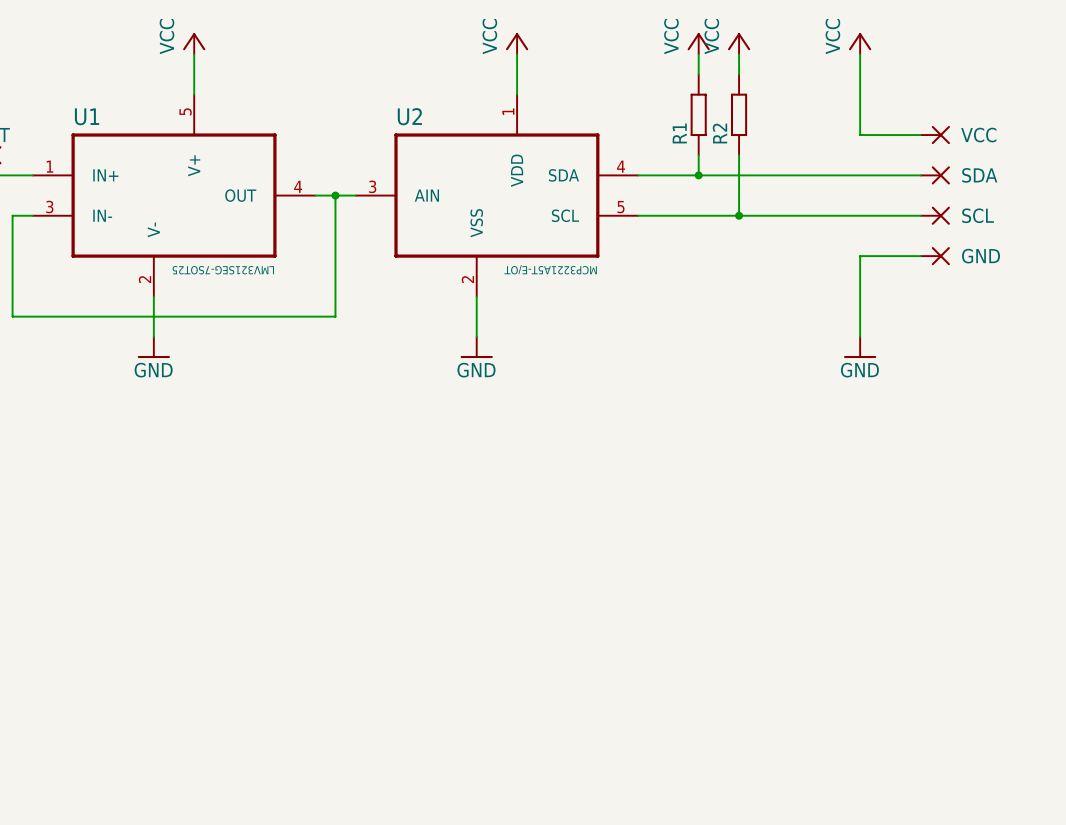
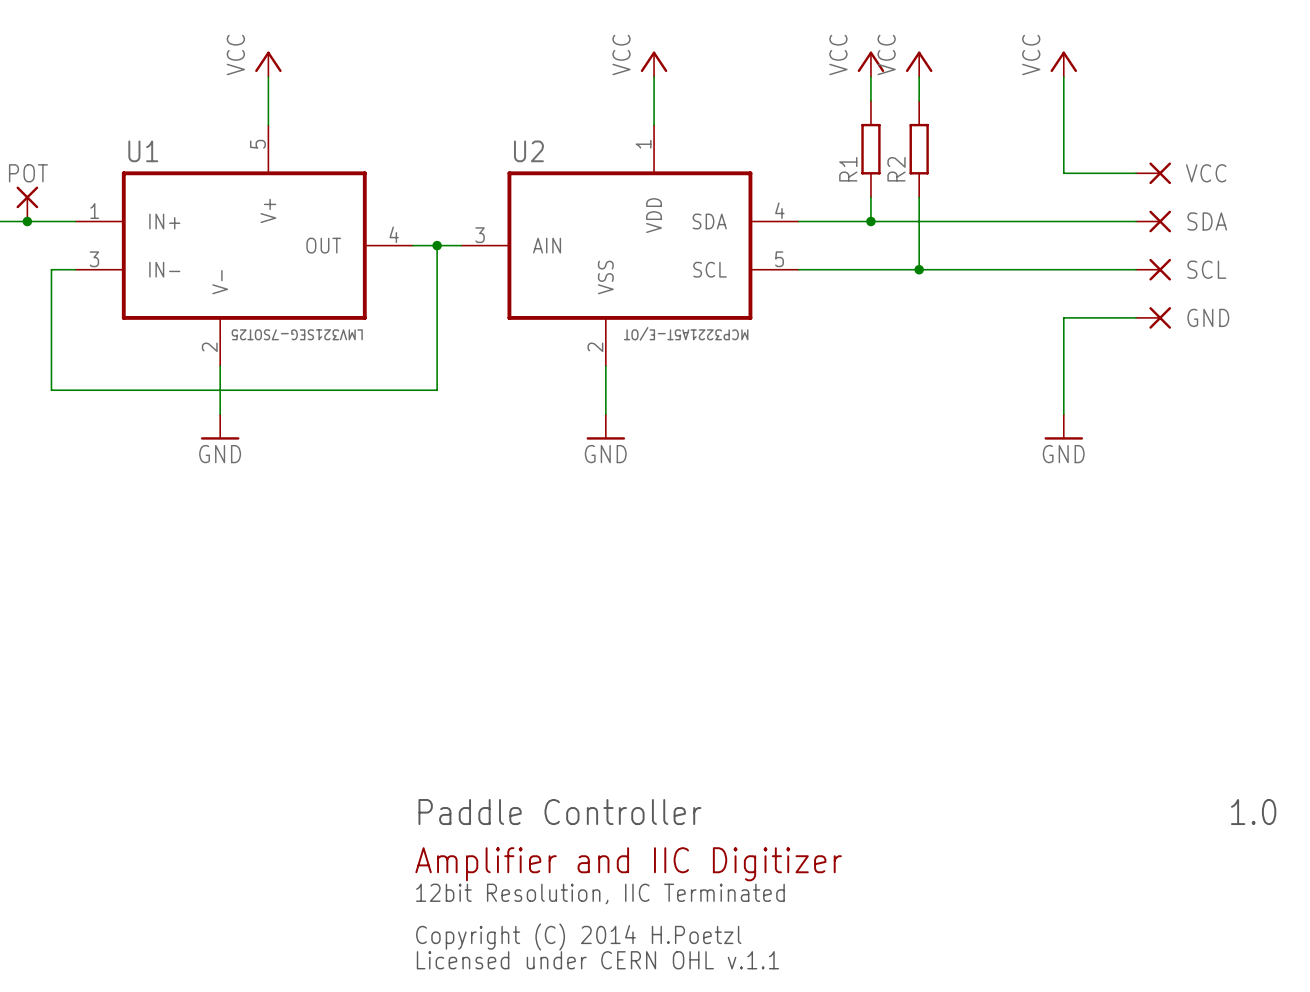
text: none -> Paddle Controller (559, 812)
text: none -> 1.0 (1253, 812)
text: none -> Amplifier and IIC Digitizer (628, 864)
text: none -> 12bit Resolution, IIC Terminated (600, 893)
text: none -> Copyright (C) 2014 H.Poetzl (578, 936)
text: none -> Licensed under CERN OHL v.1.1 (597, 960)

